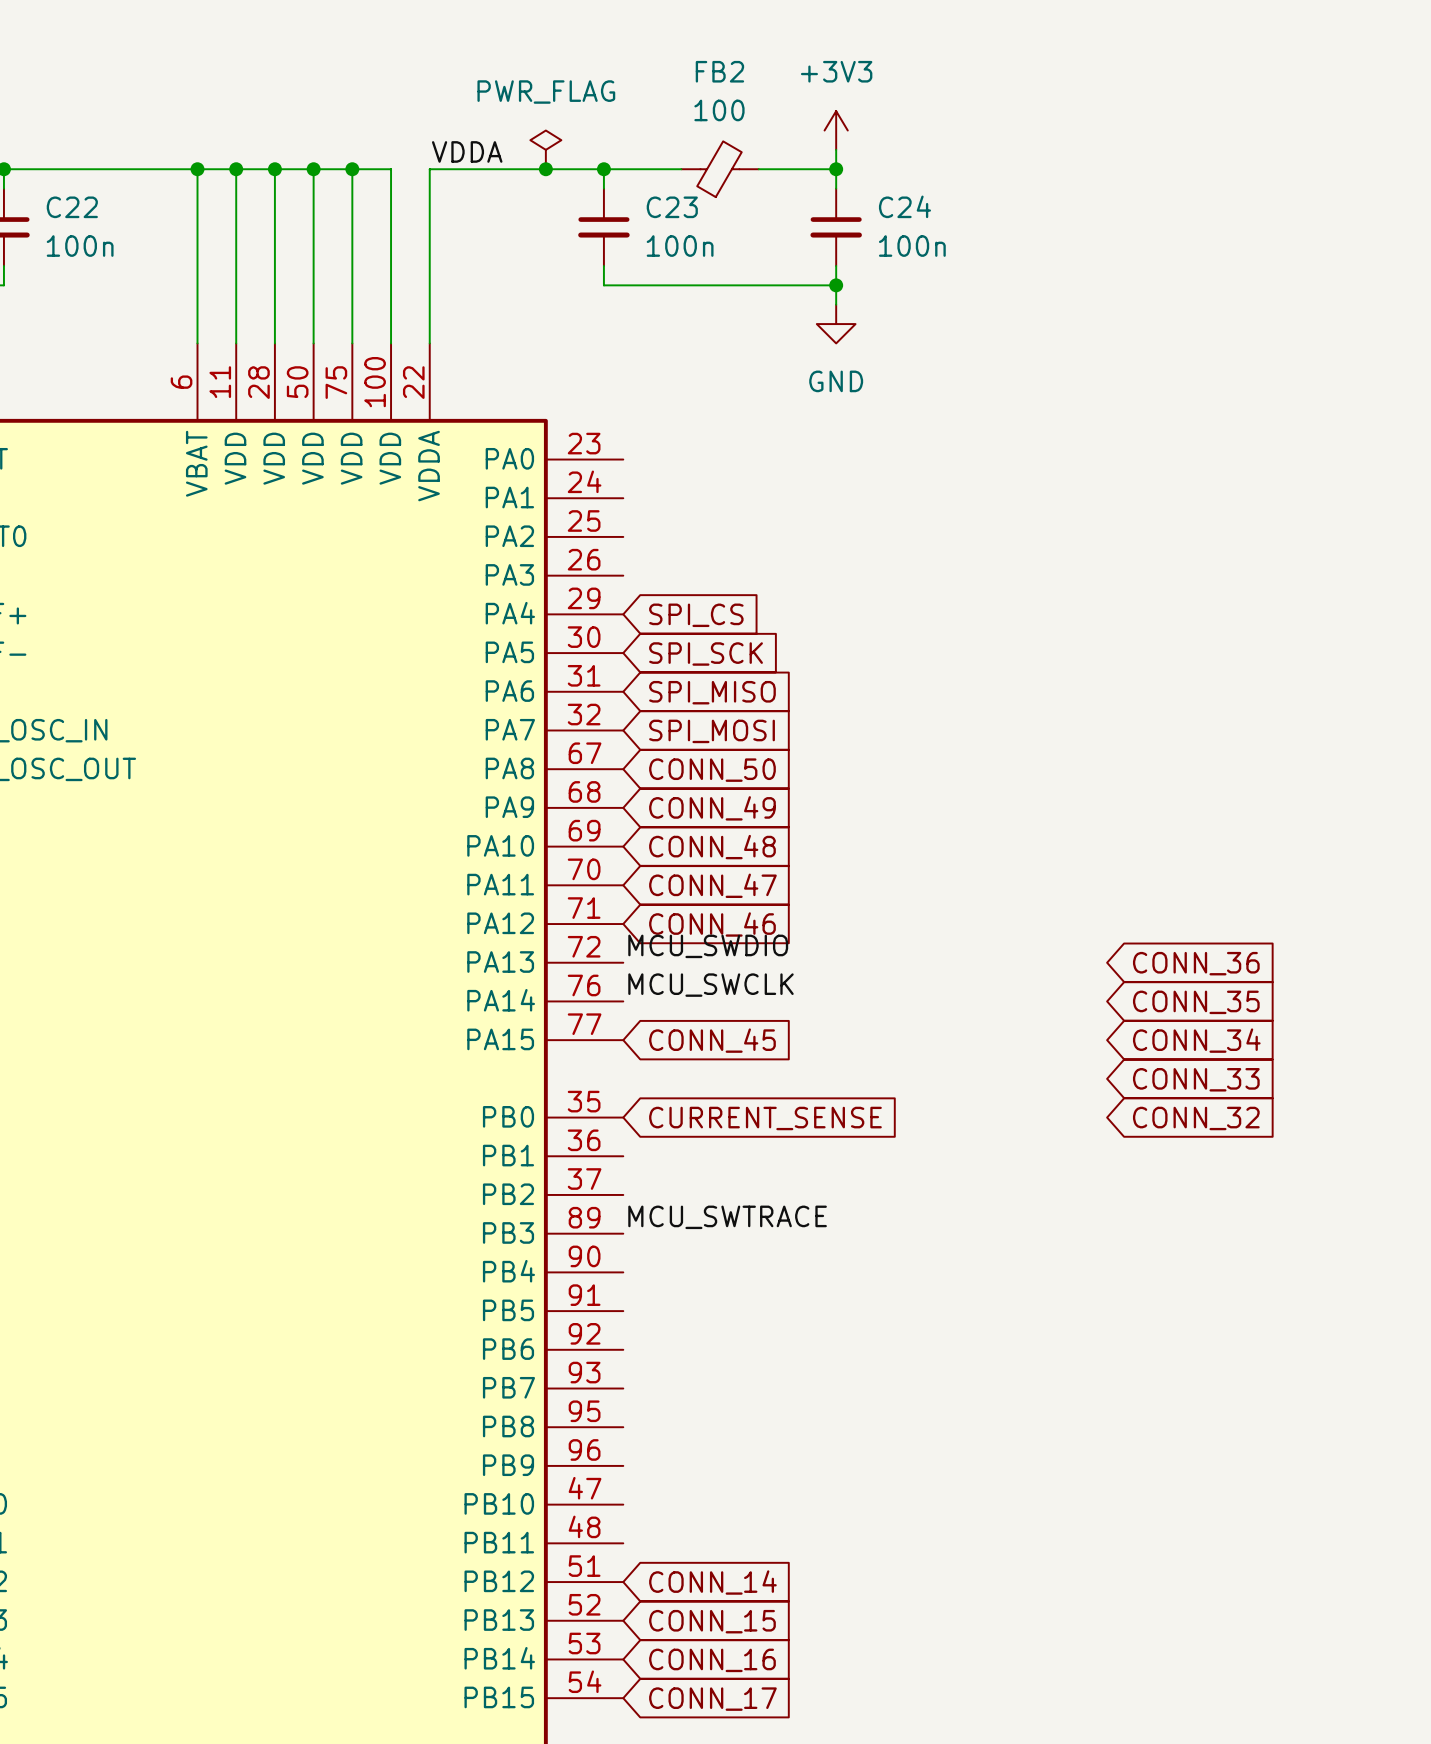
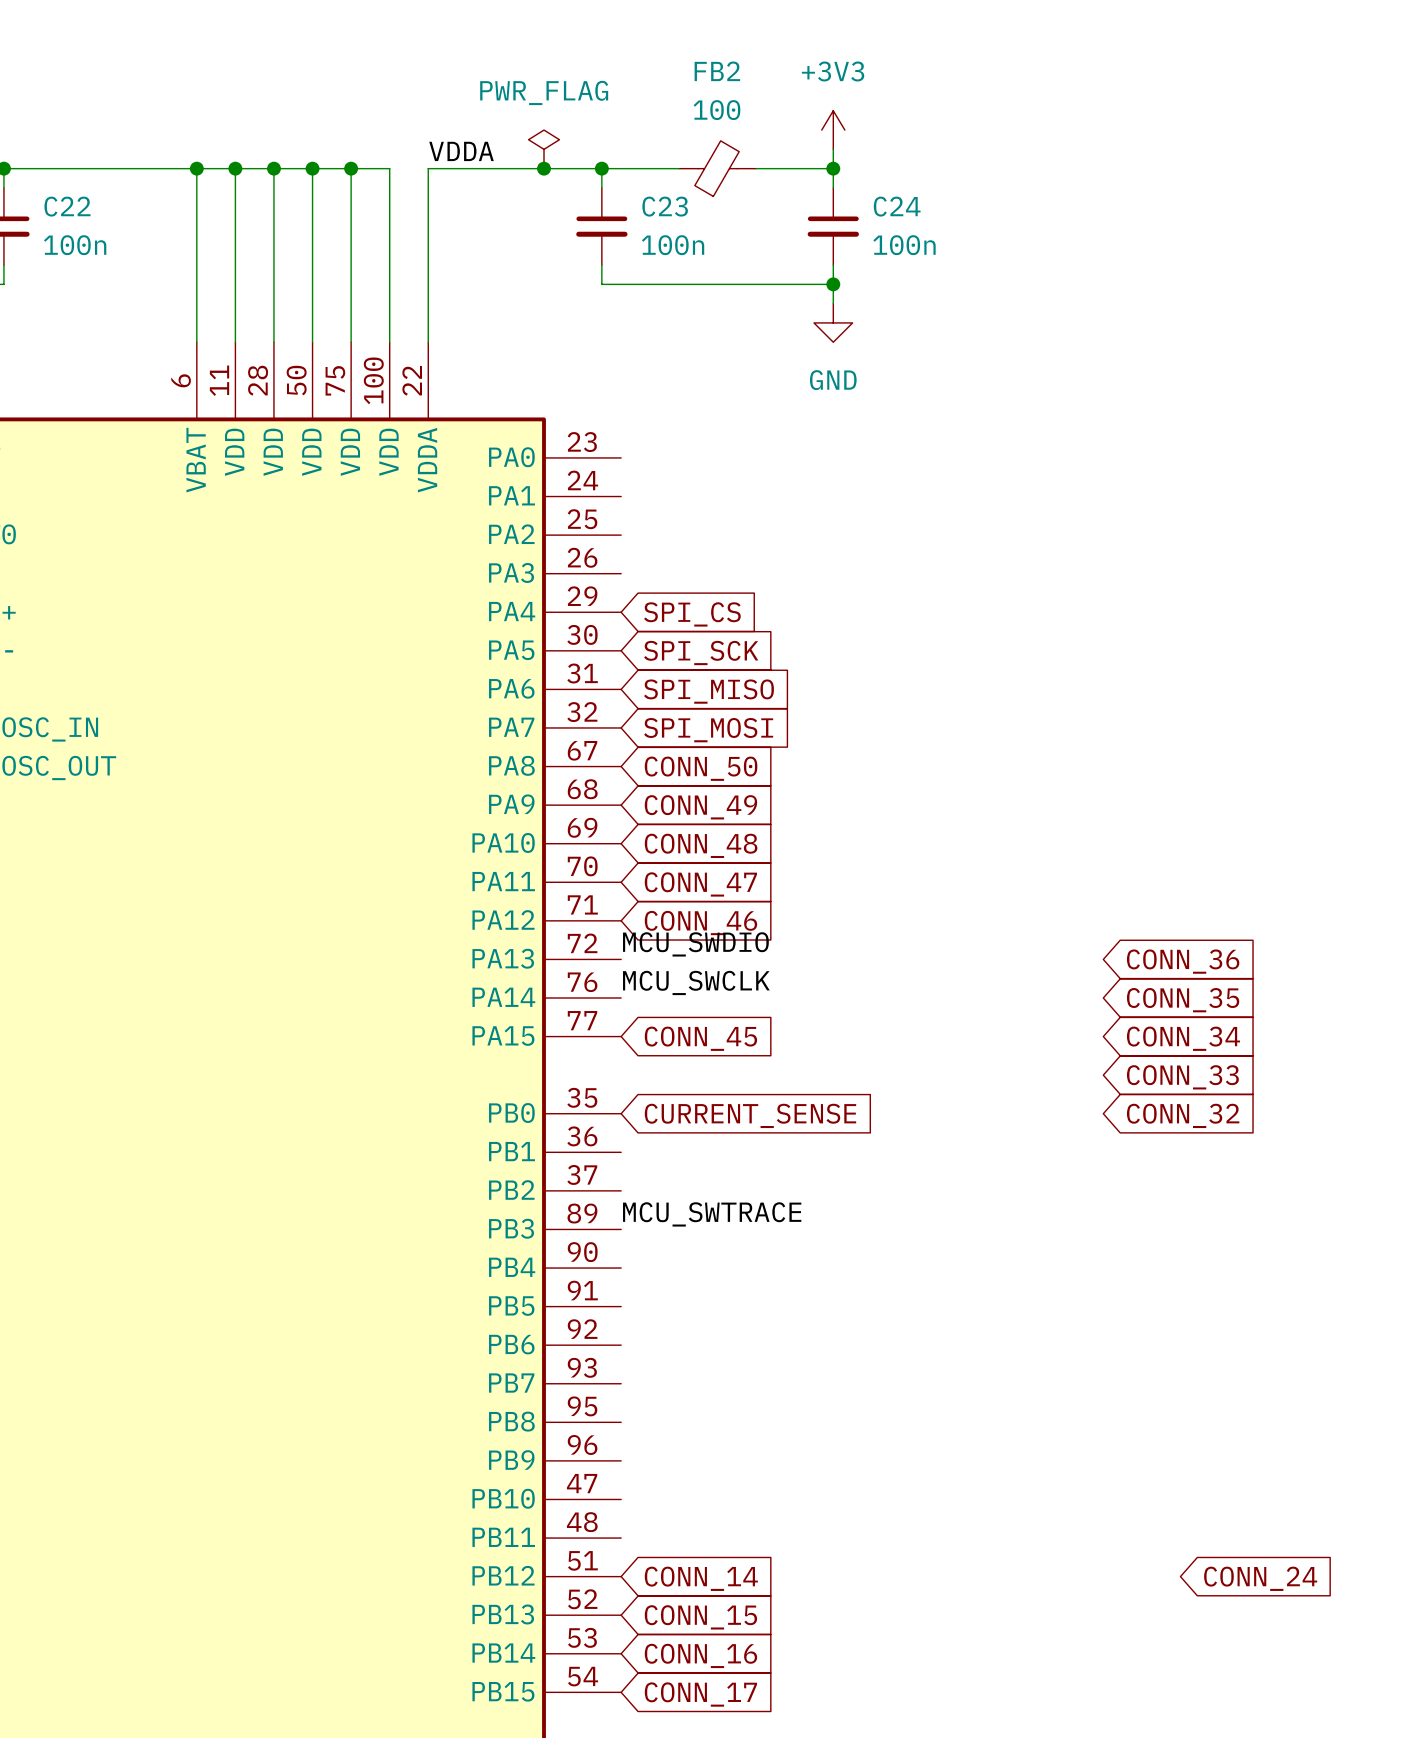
global label: none -> CONN_24 (1260, 1578)

